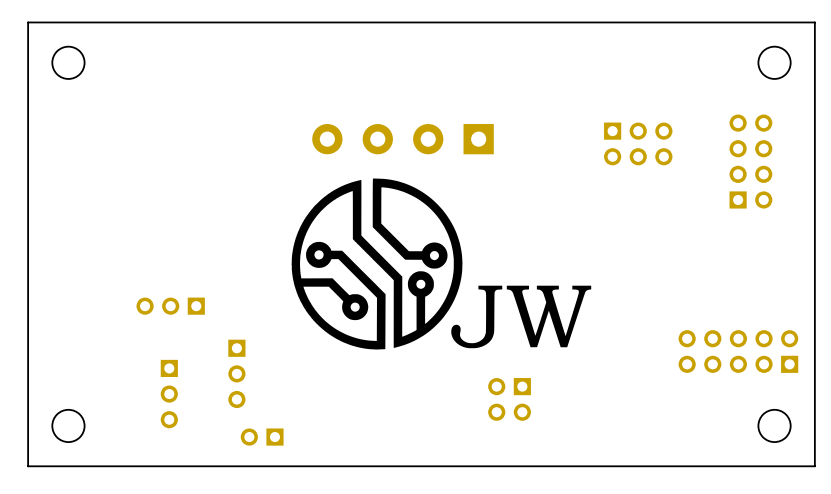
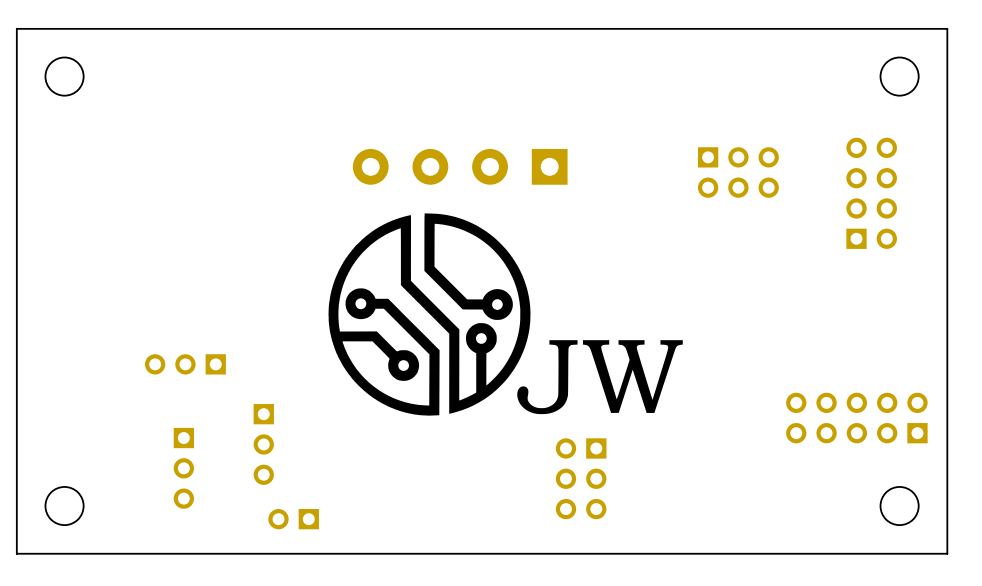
part footprint: [488, 378, 531, 421] -> [555, 438, 607, 520]

